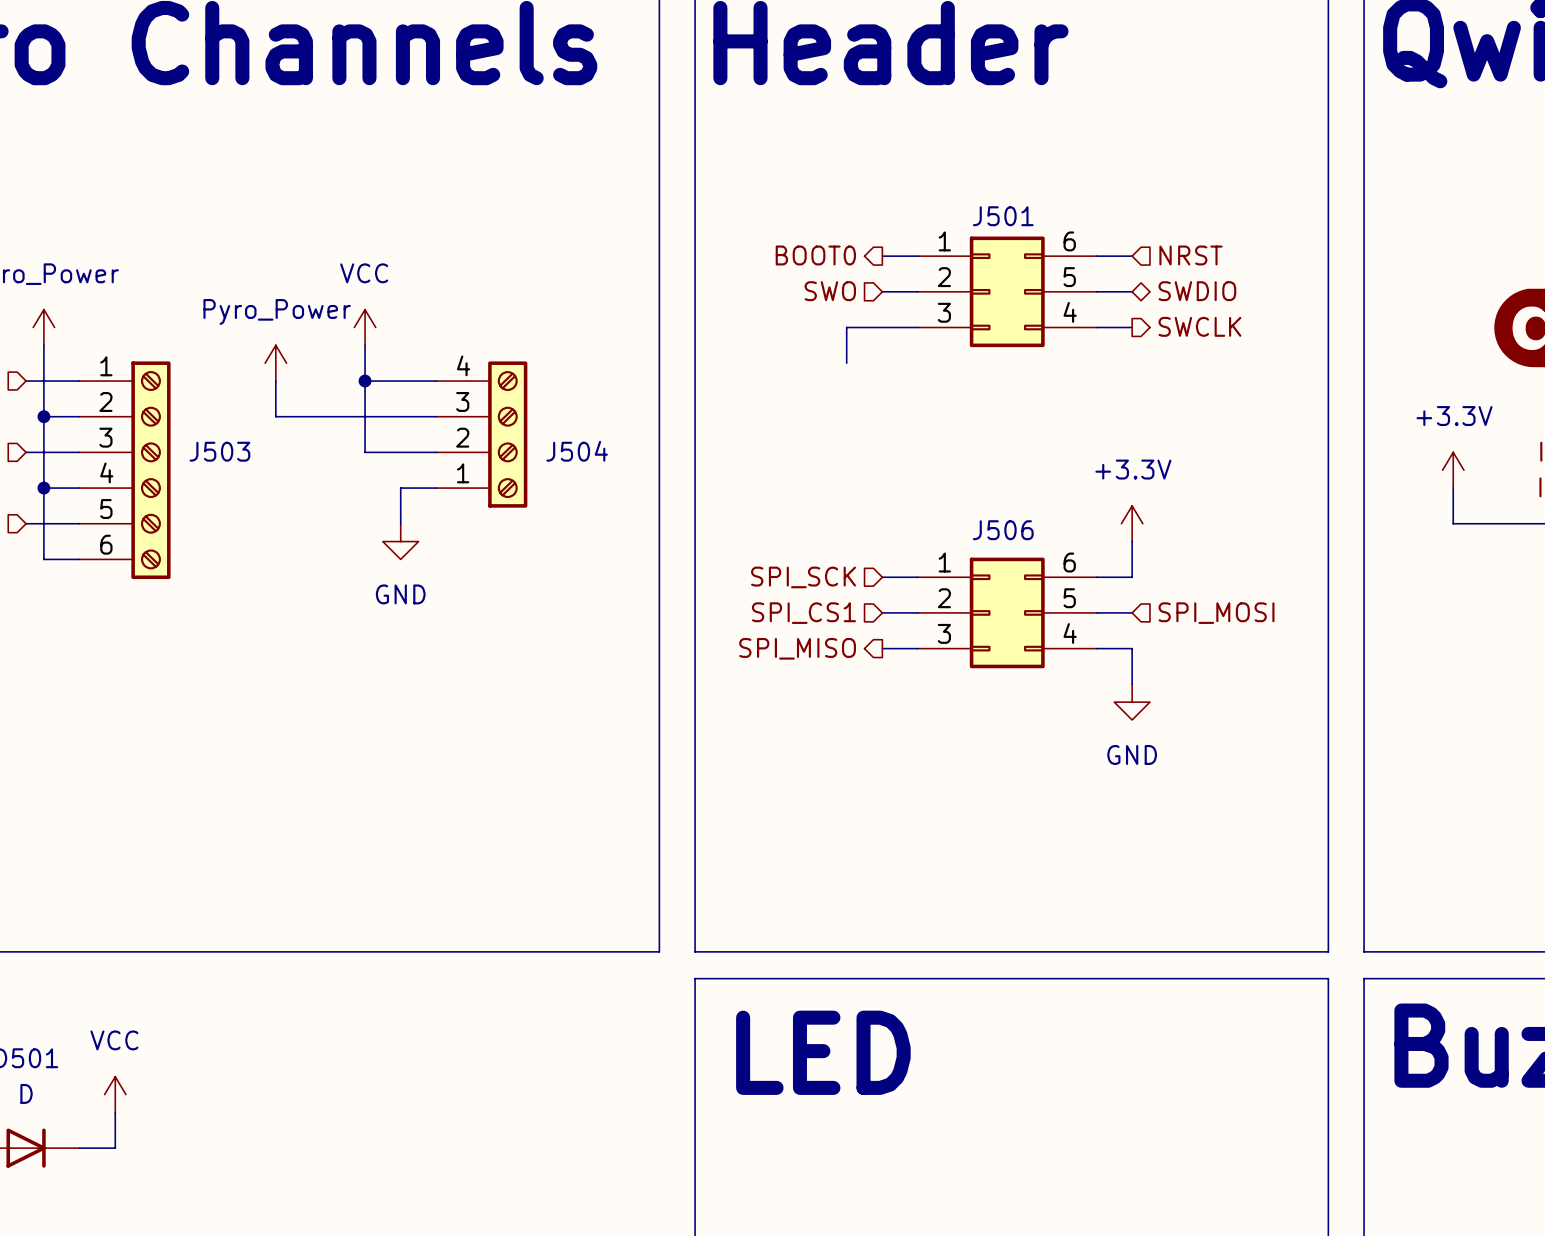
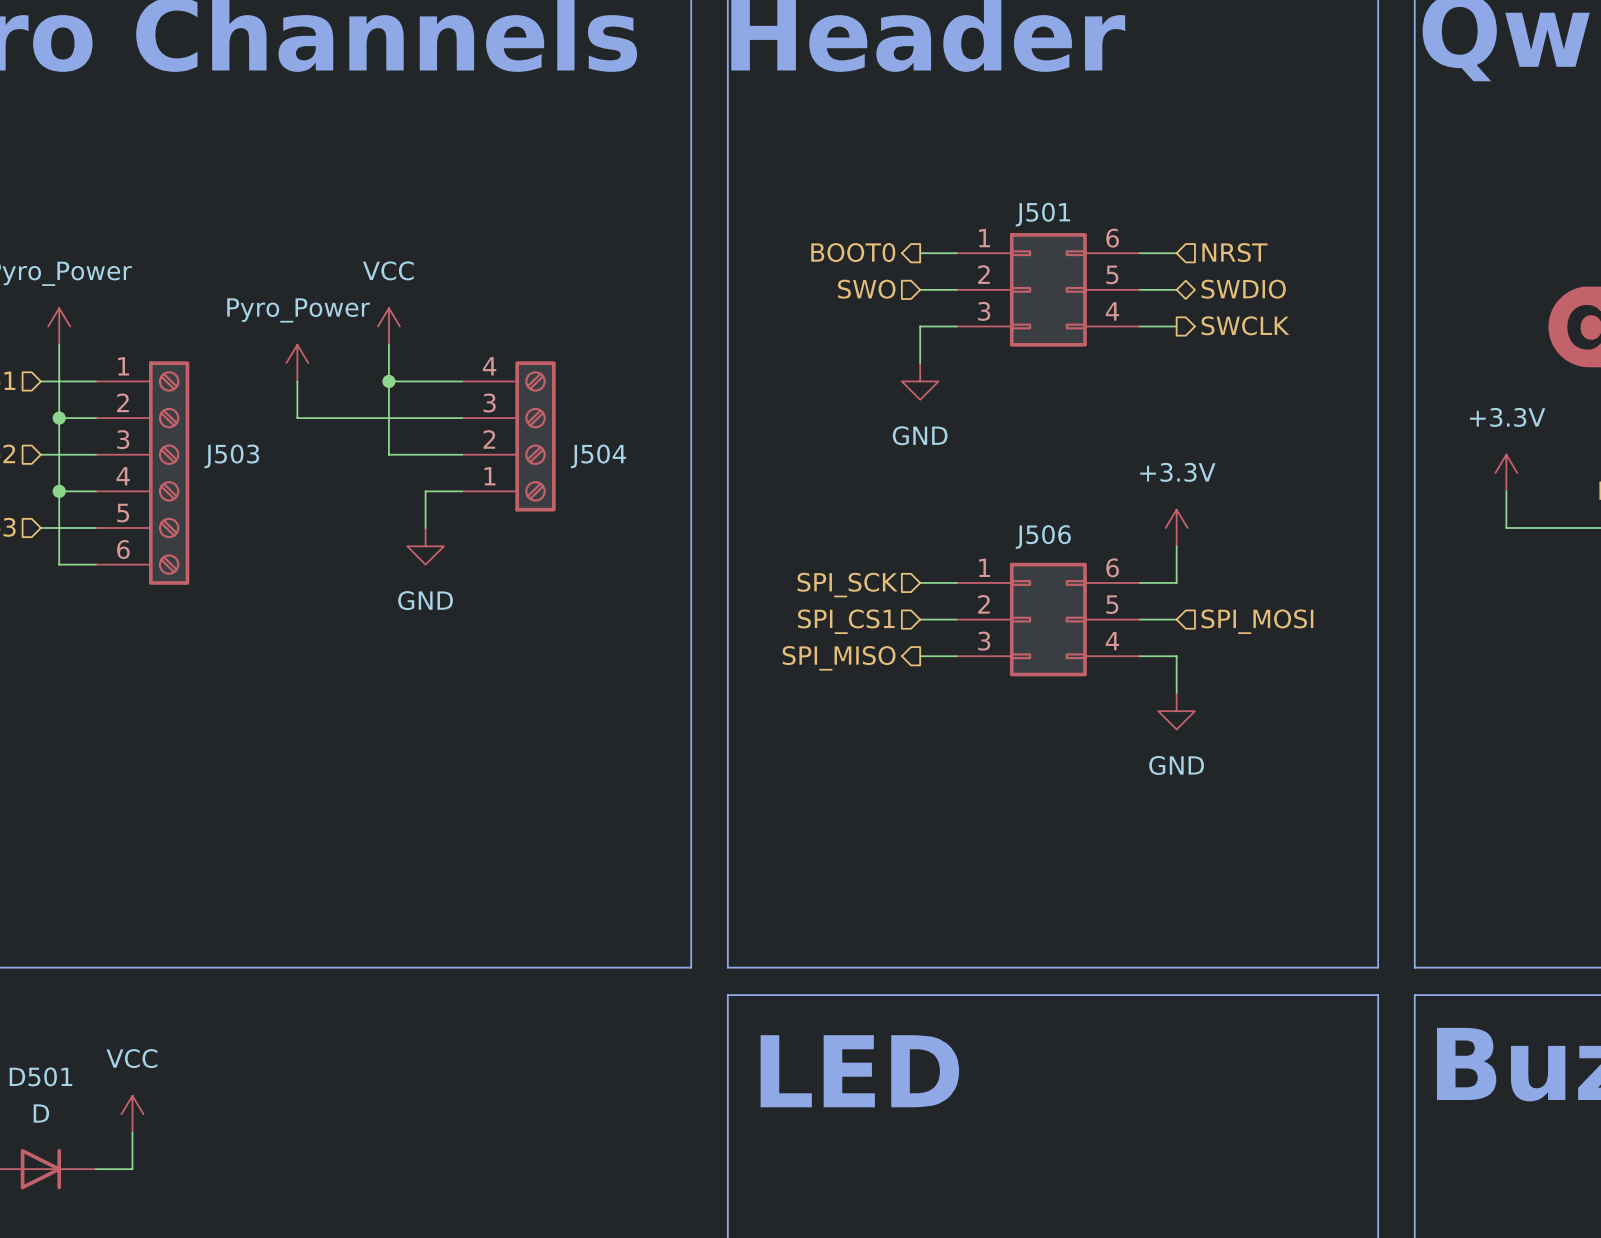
wire: (882, 327) (846, 327) (846, 363) -> (920, 326) (920, 363)
power symbol: none -> GND (920, 381)

